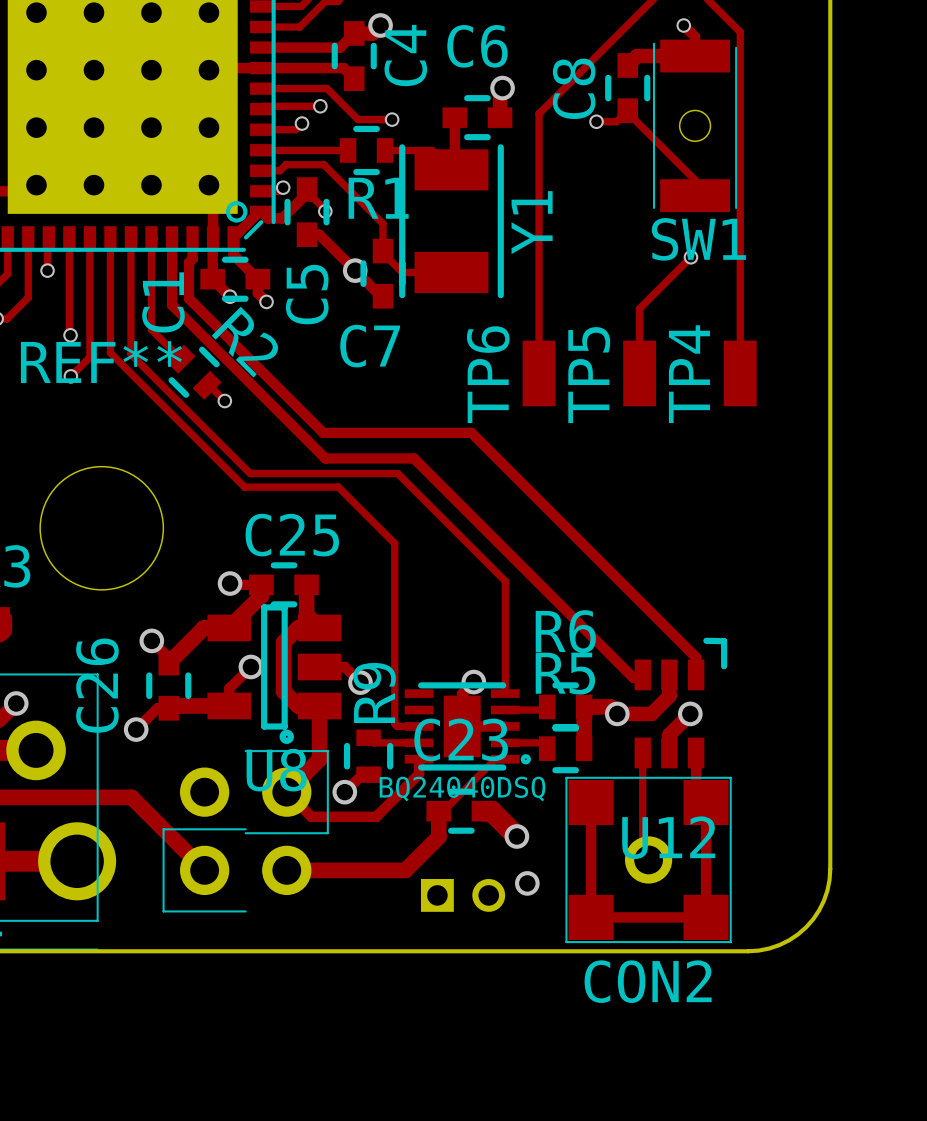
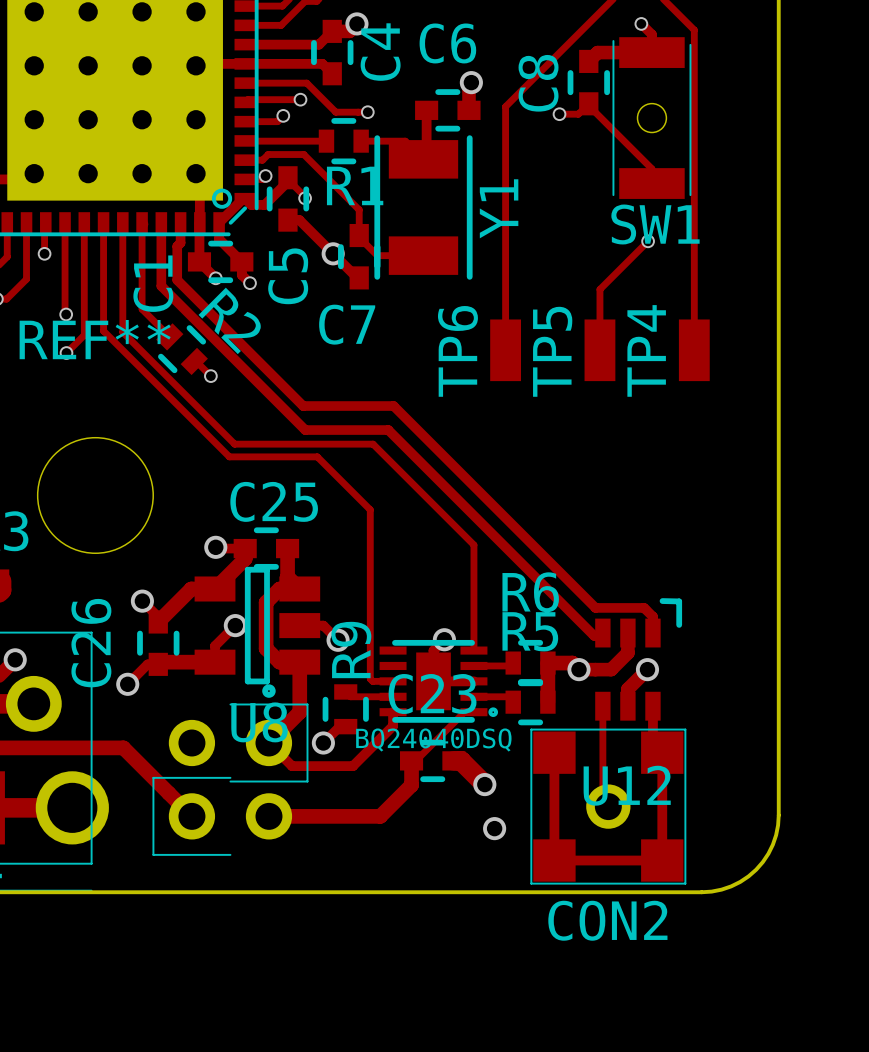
track: (419, 432) (471, 432) (686, 648) -> (393, 406) (595, 607) (644, 607)
part: (463, 895) -> none

